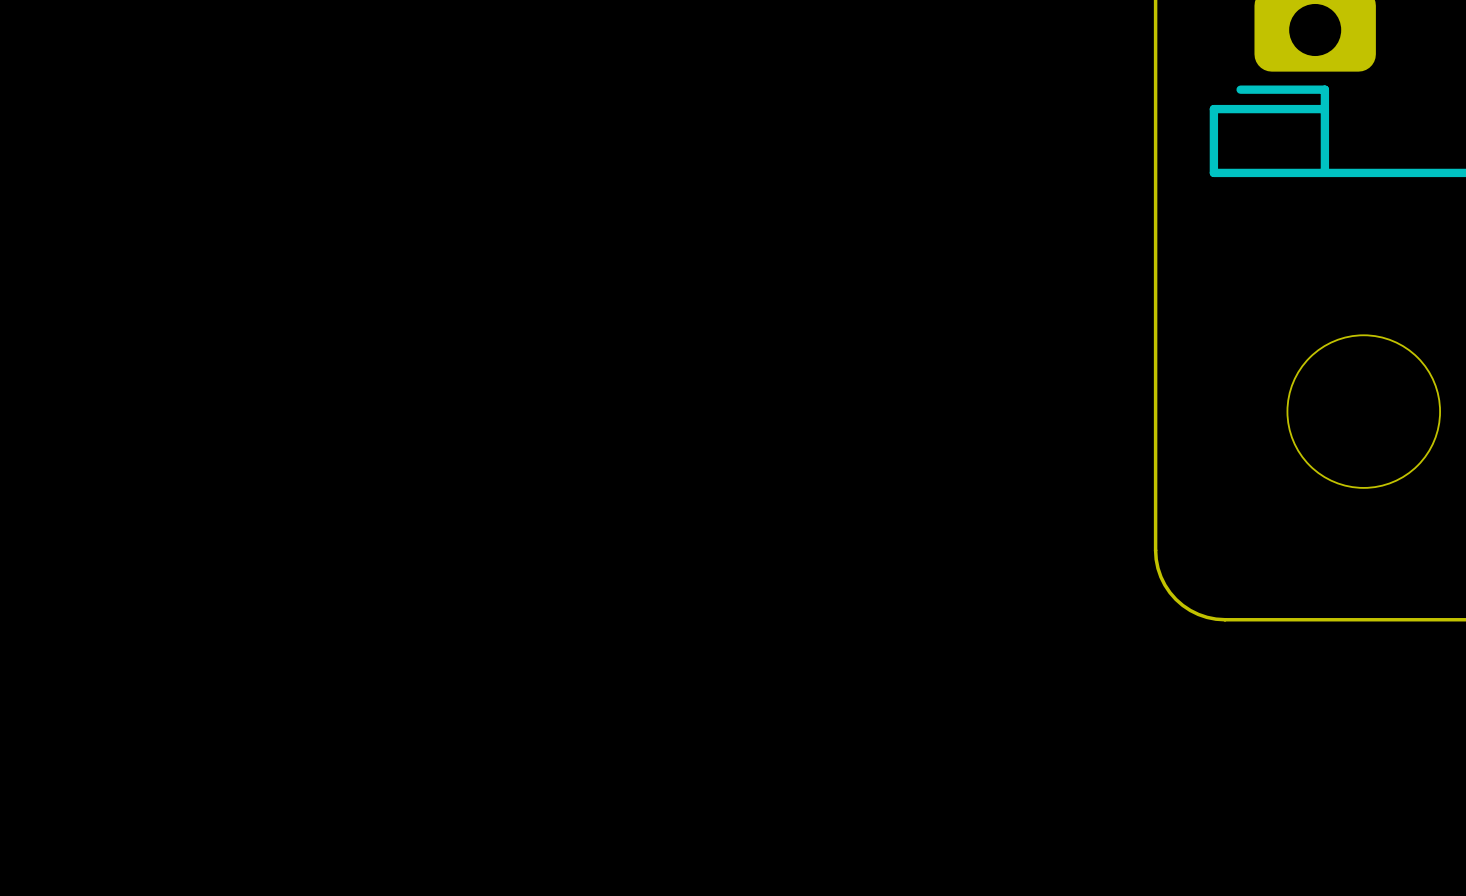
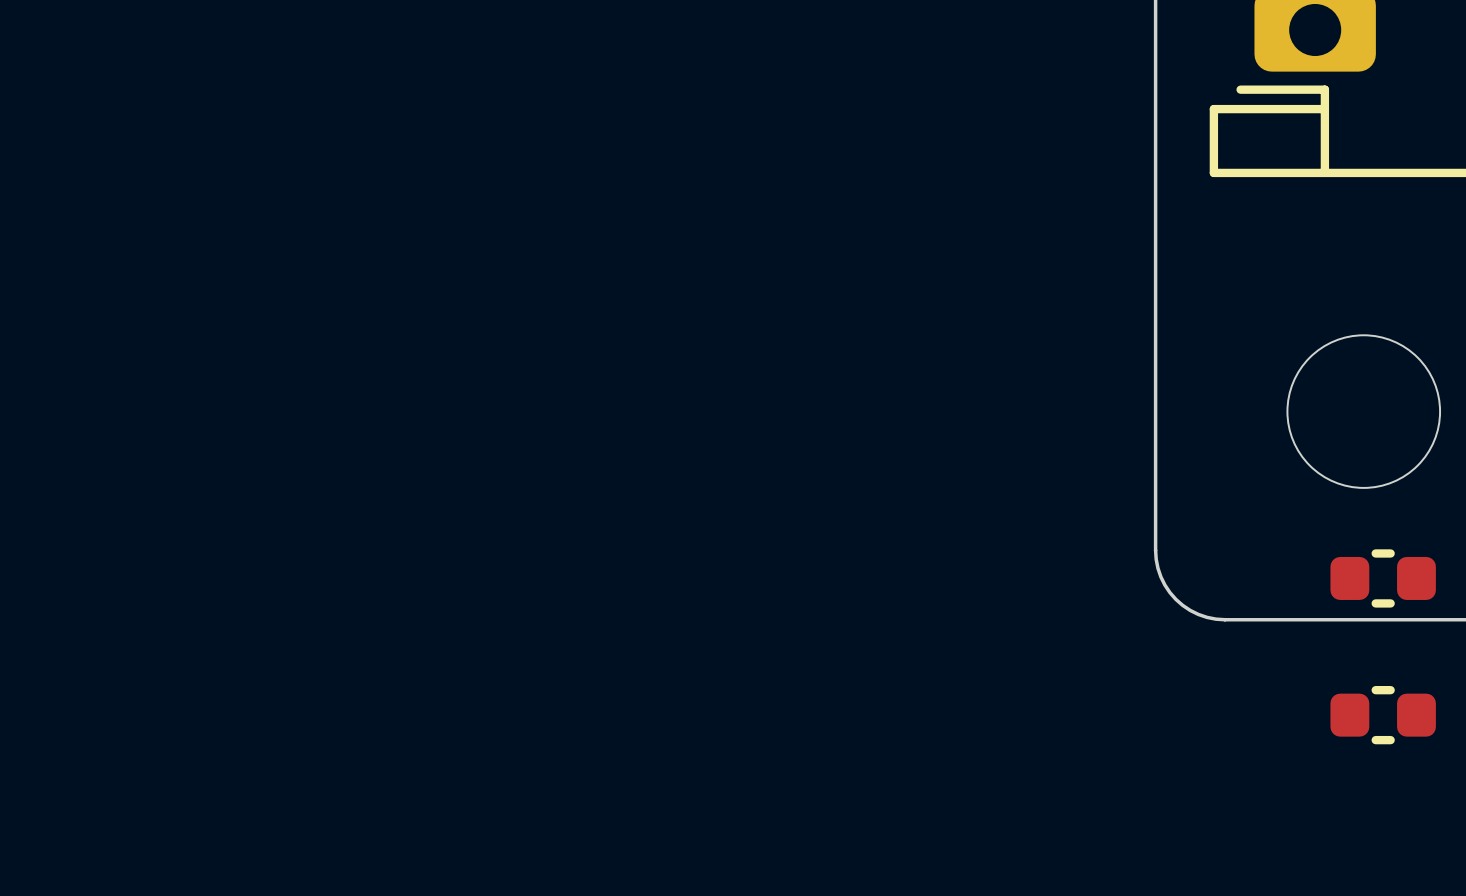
part: none -> (1383, 578)
part: none -> (1383, 715)

